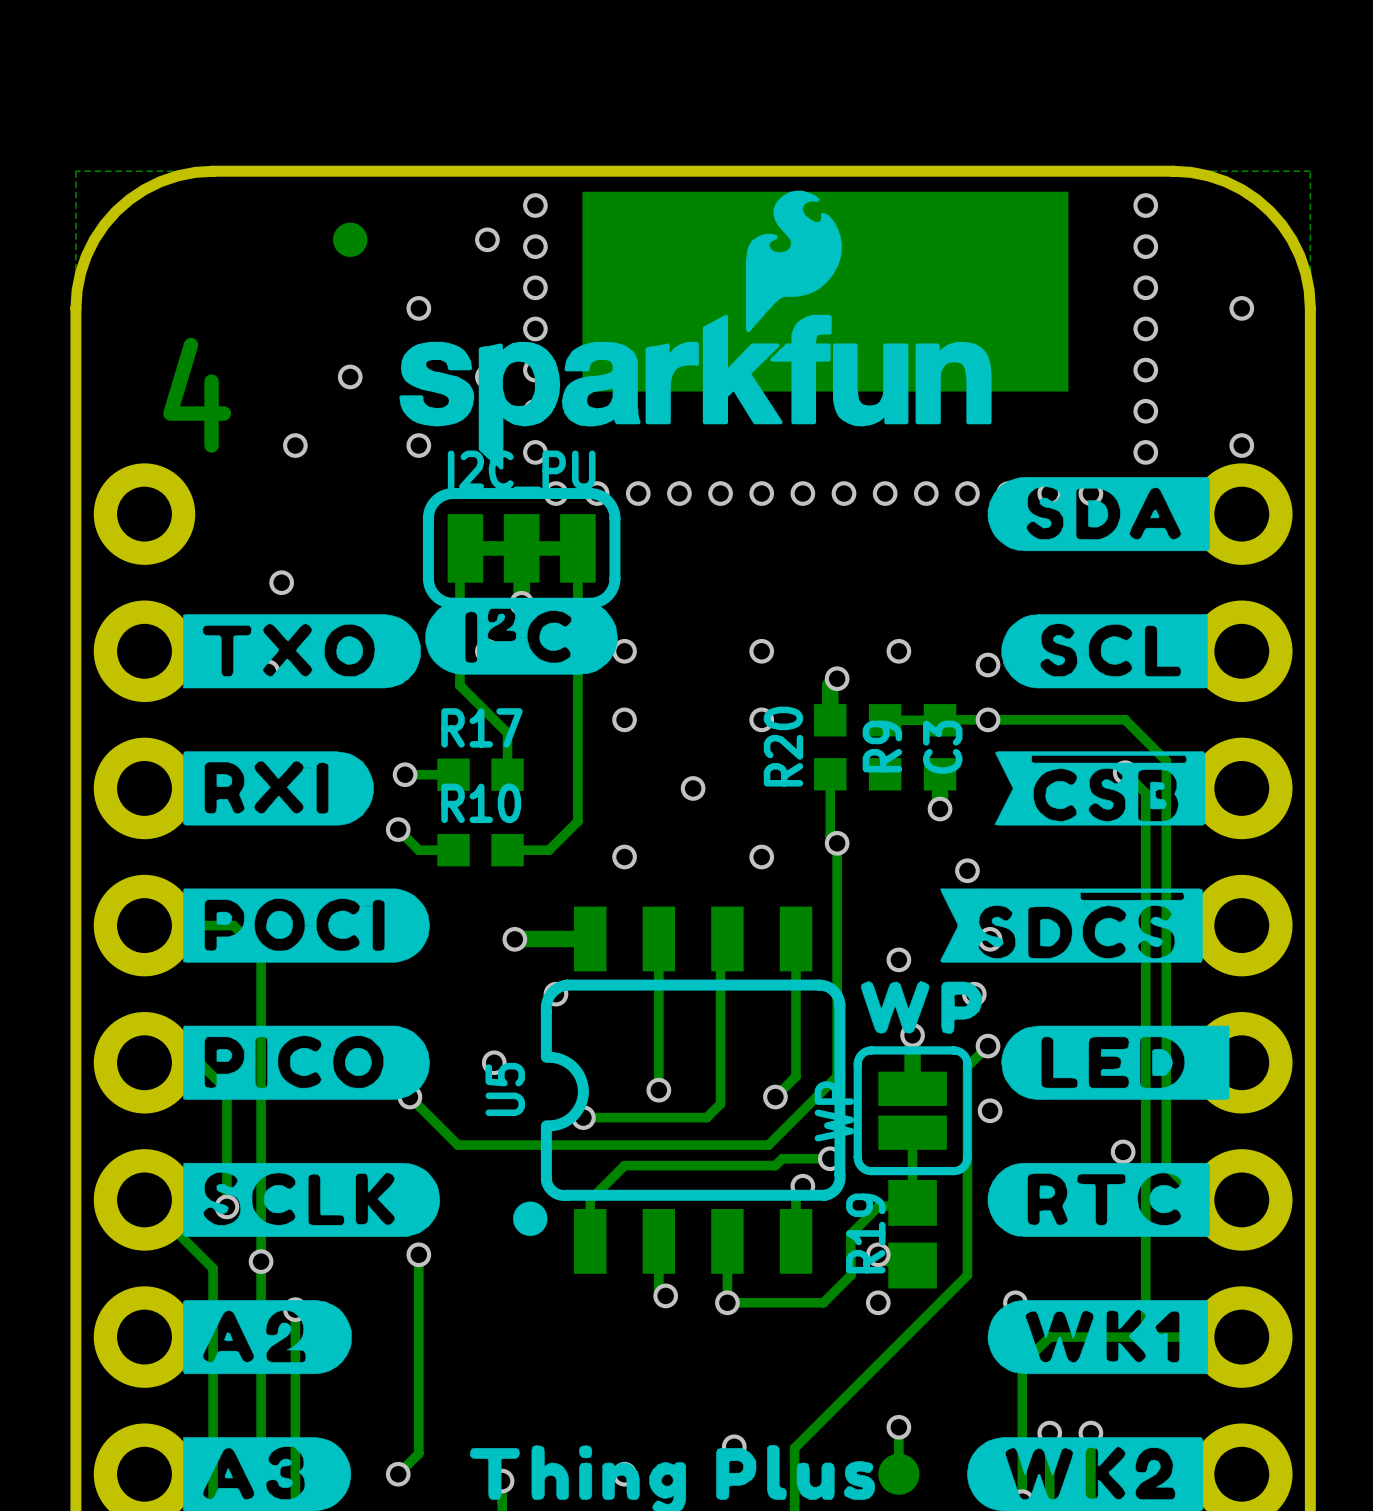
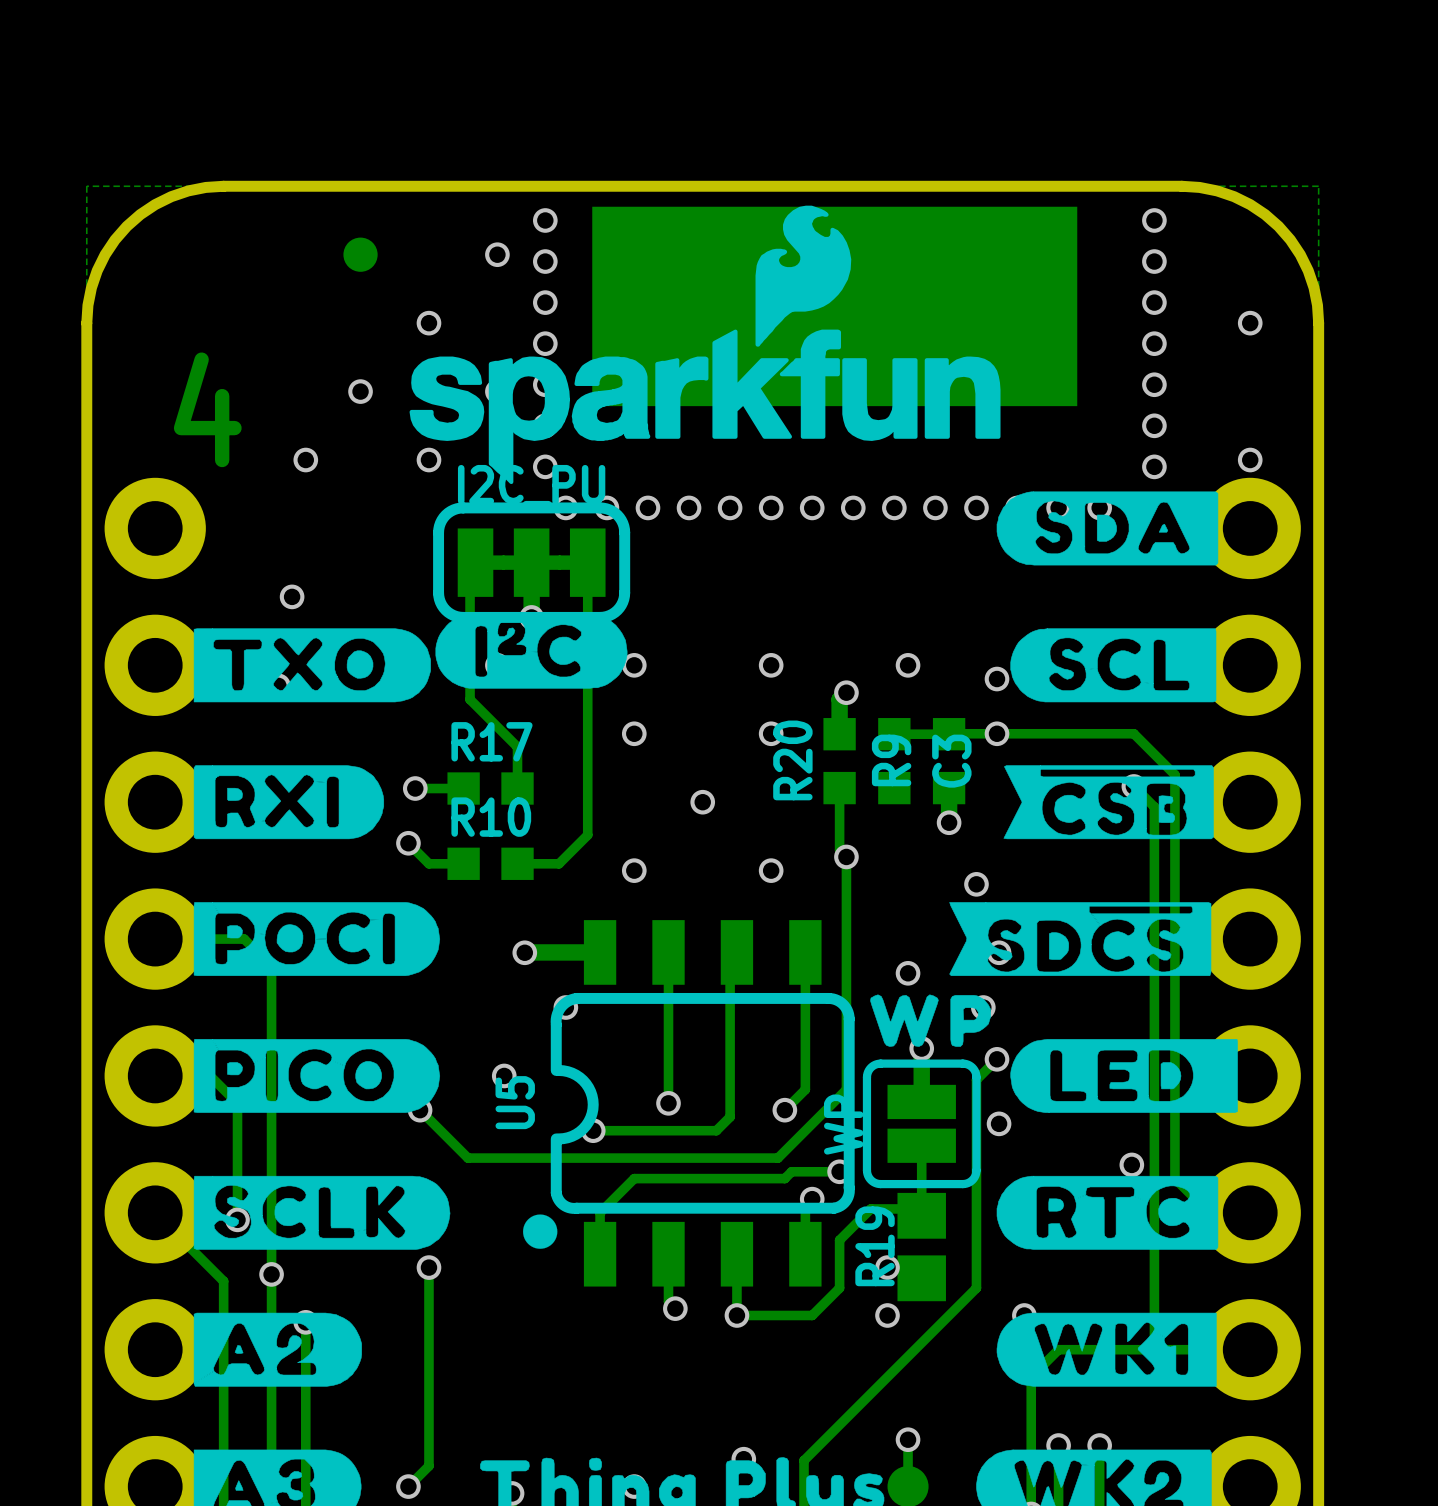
track: (912, 1196) (912, 1202) (877, 1207) (850, 1234) (850, 1275) (823, 1302) (802, 1302) -> (921, 1208) (870, 1208) (839, 1240) (839, 1288) (812, 1315)

